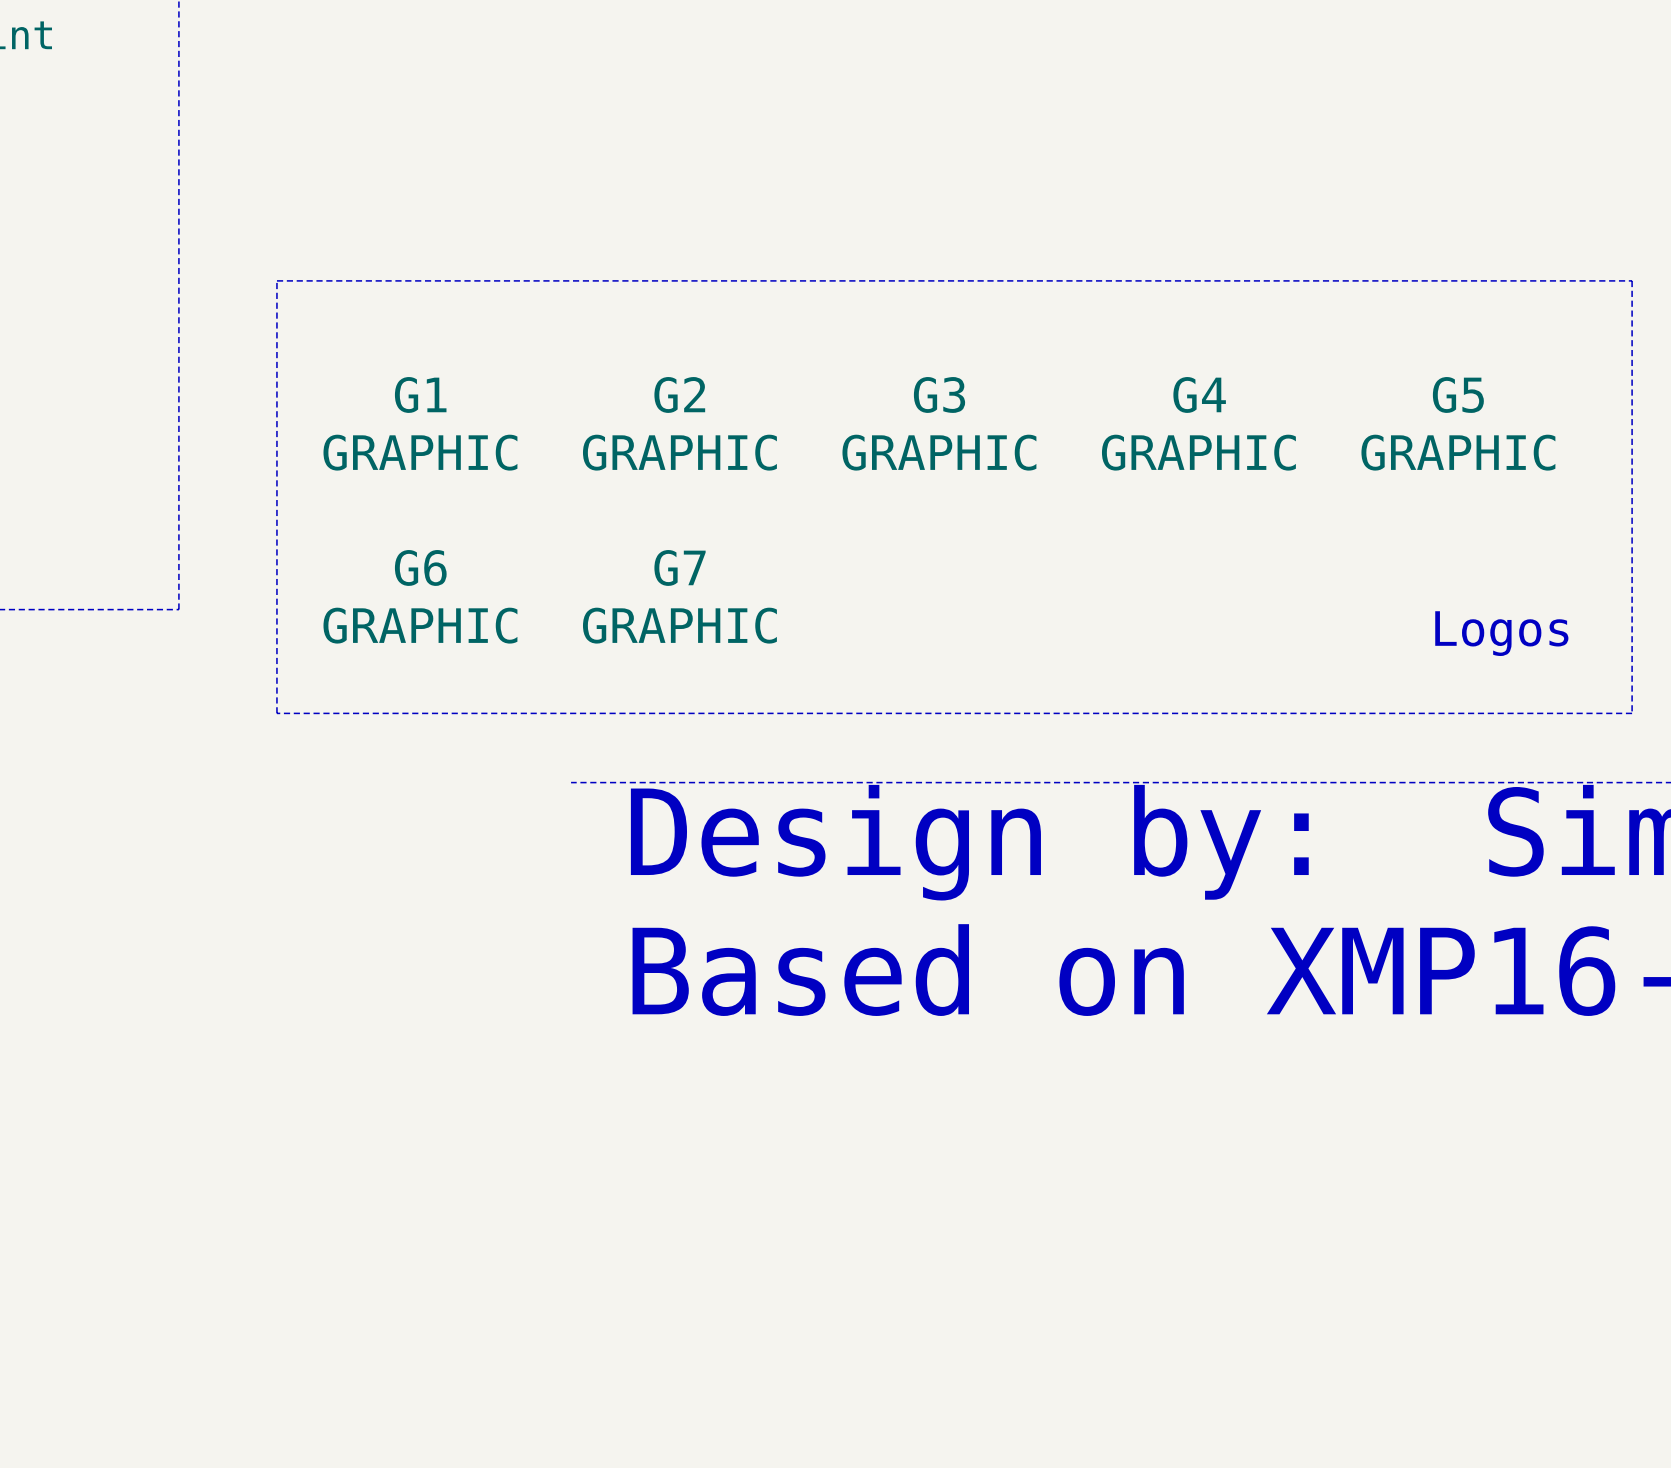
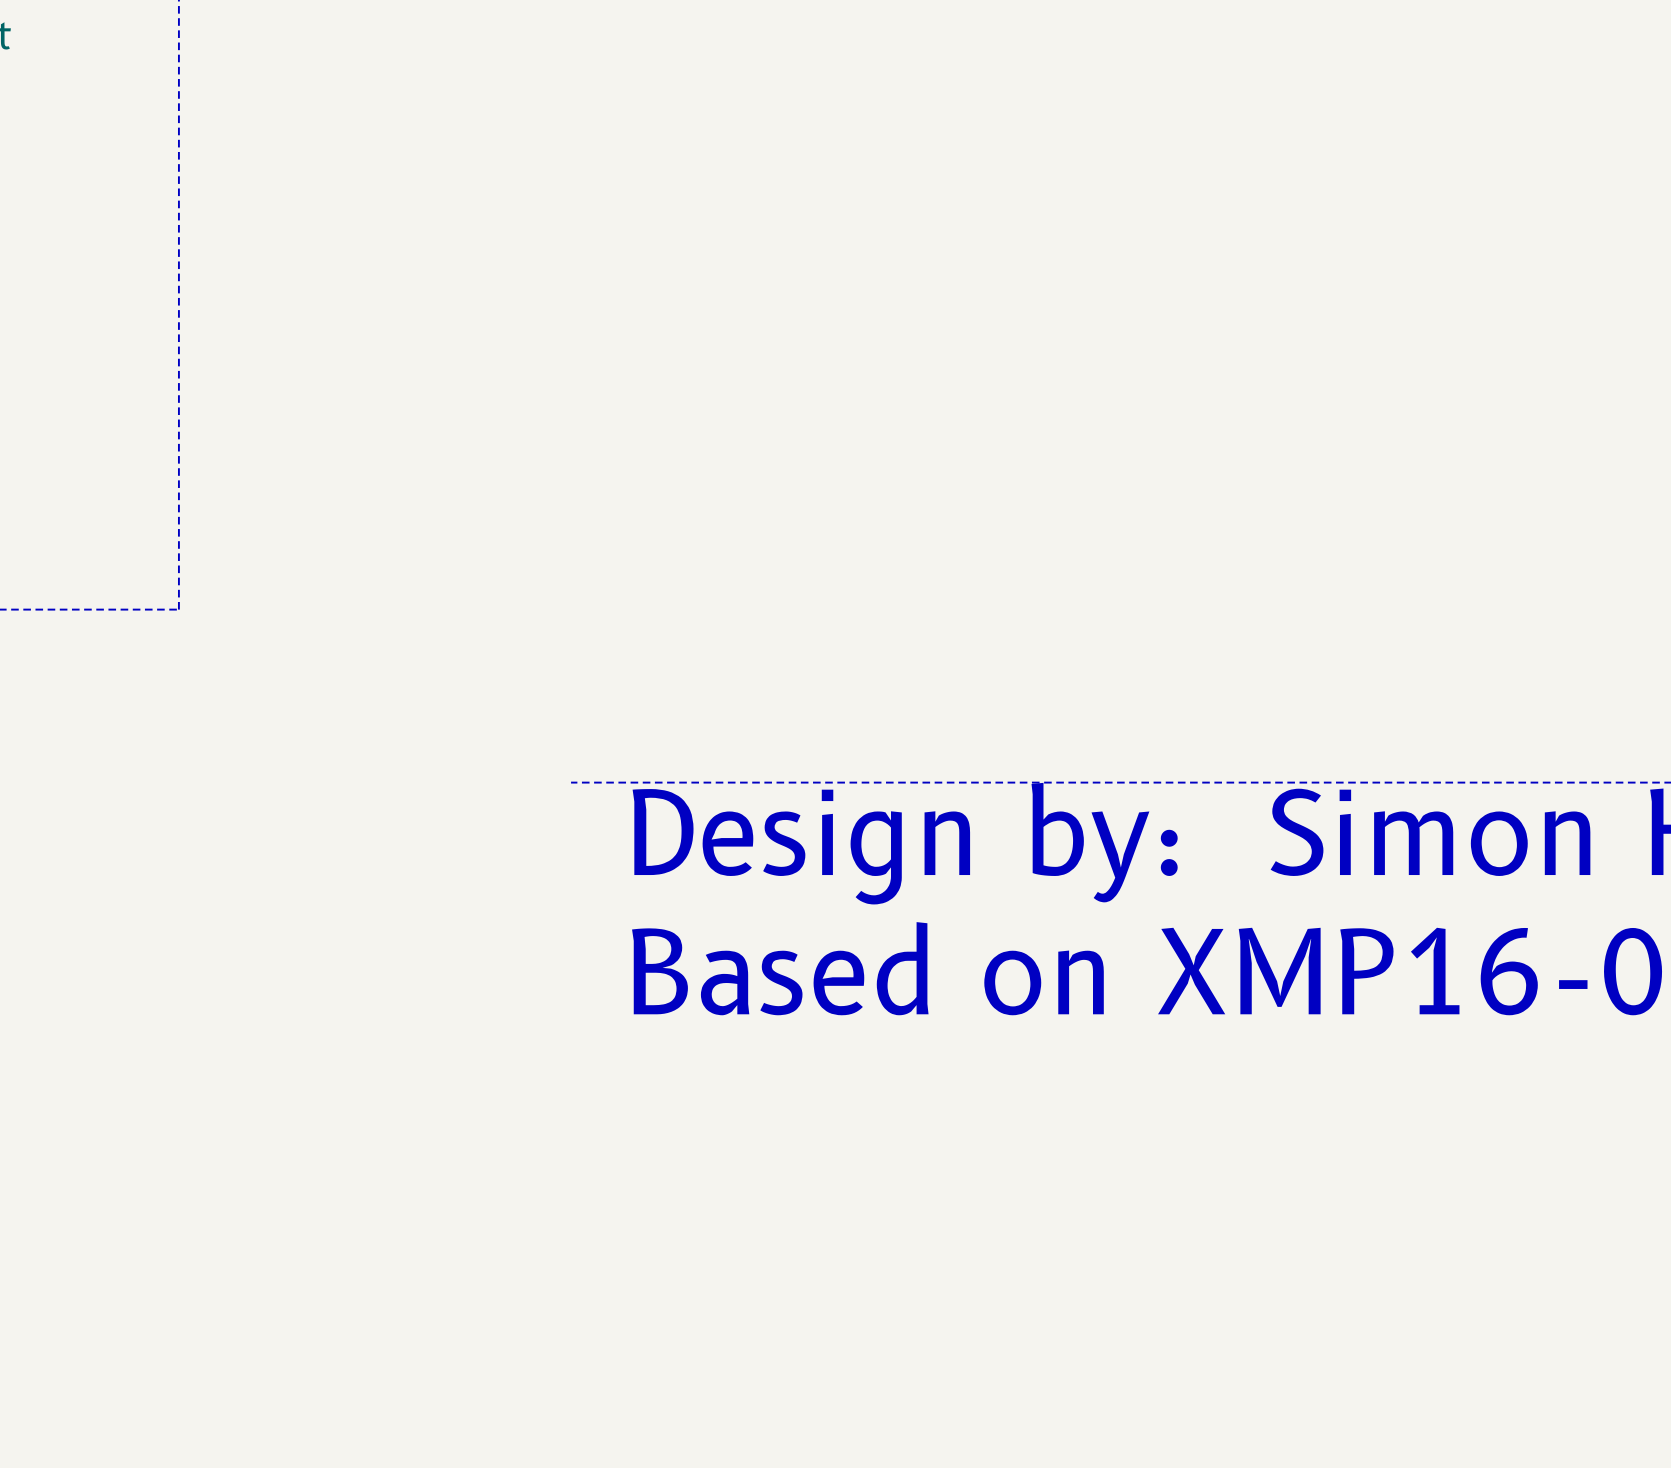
line: (276, 280) (1632, 280) (1632, 713) (276, 713) (276, 280) -> none
G1: GRAPHIC (420, 423) -> none
G2: GRAPHIC (679, 423) -> none
G3: GRAPHIC (939, 423) -> none
G4: GRAPHIC (1198, 423) -> none
G5: GRAPHIC (1458, 423) -> none
G6: GRAPHIC (420, 596) -> none
G7: GRAPHIC (679, 596) -> none
text: Logos (1501, 633) -> none

